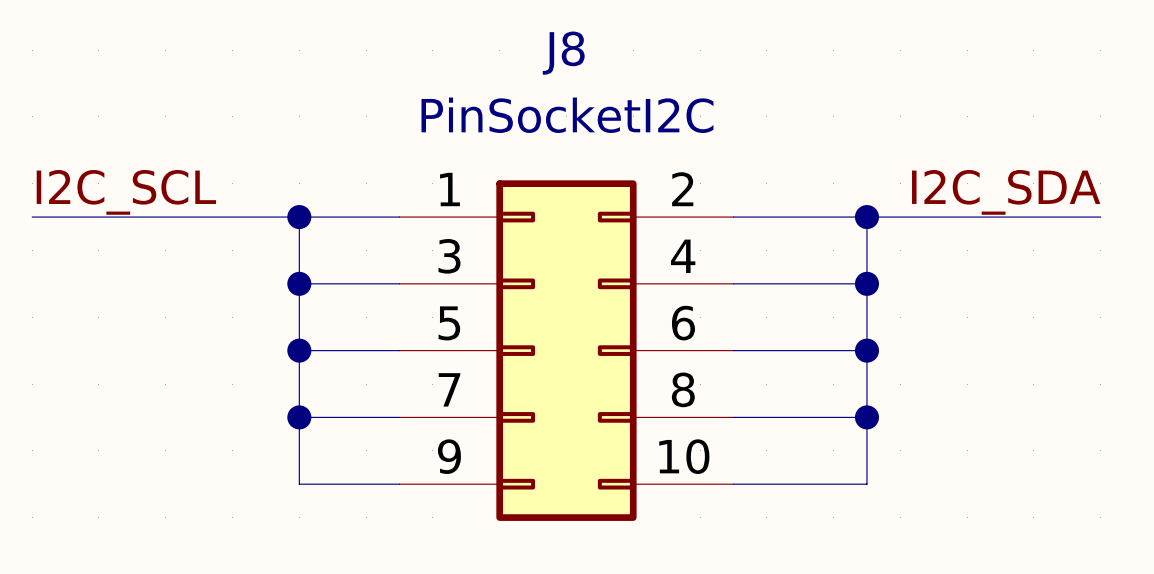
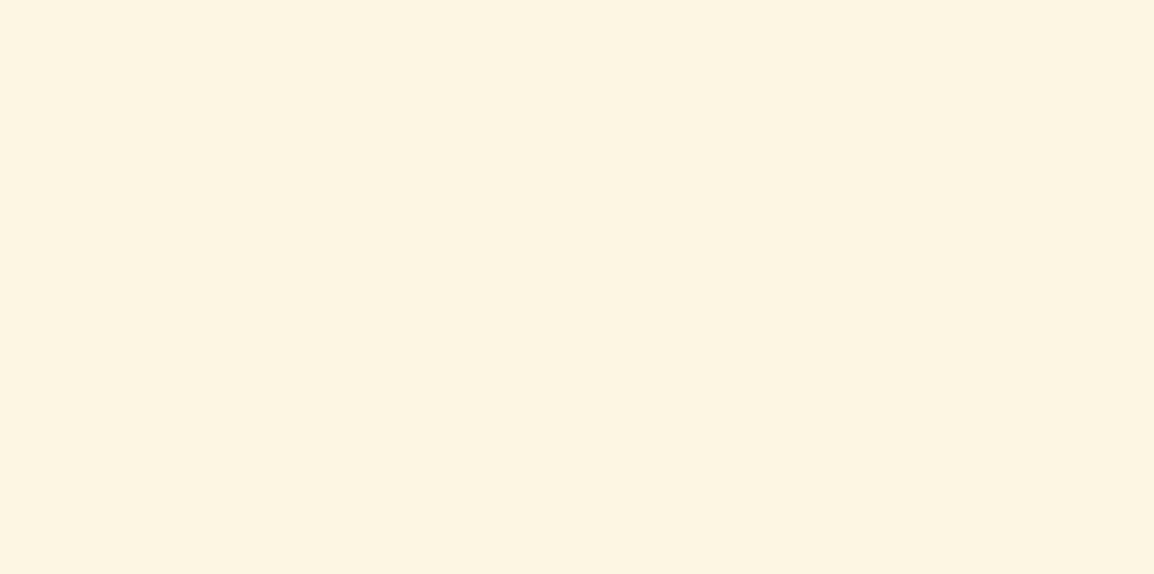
label: I2C_SCL (126, 192) -> none
label: I2C_SDA (1006, 192) -> none
wire: (32, 217) (399, 217) -> none
wire: (299, 217) (299, 484) (399, 484) -> none
junction: (299, 217) -> none
wire: (733, 217) (1100, 217) -> none
wire: (866, 217) (866, 484) (733, 484) -> none
junction: (866, 217) -> none
wire: (299, 283) (399, 283) -> none
junction: (299, 283) -> none
wire: (733, 283) (866, 283) -> none
junction: (866, 283) -> none
wire: (299, 350) (399, 350) -> none
junction: (299, 350) -> none
J8: PinSocketI2C (566, 350) -> none
wire: (733, 350) (866, 350) -> none
junction: (866, 350) -> none
wire: (299, 417) (399, 417) -> none
junction: (299, 417) -> none
wire: (733, 417) (866, 417) -> none
junction: (866, 417) -> none

